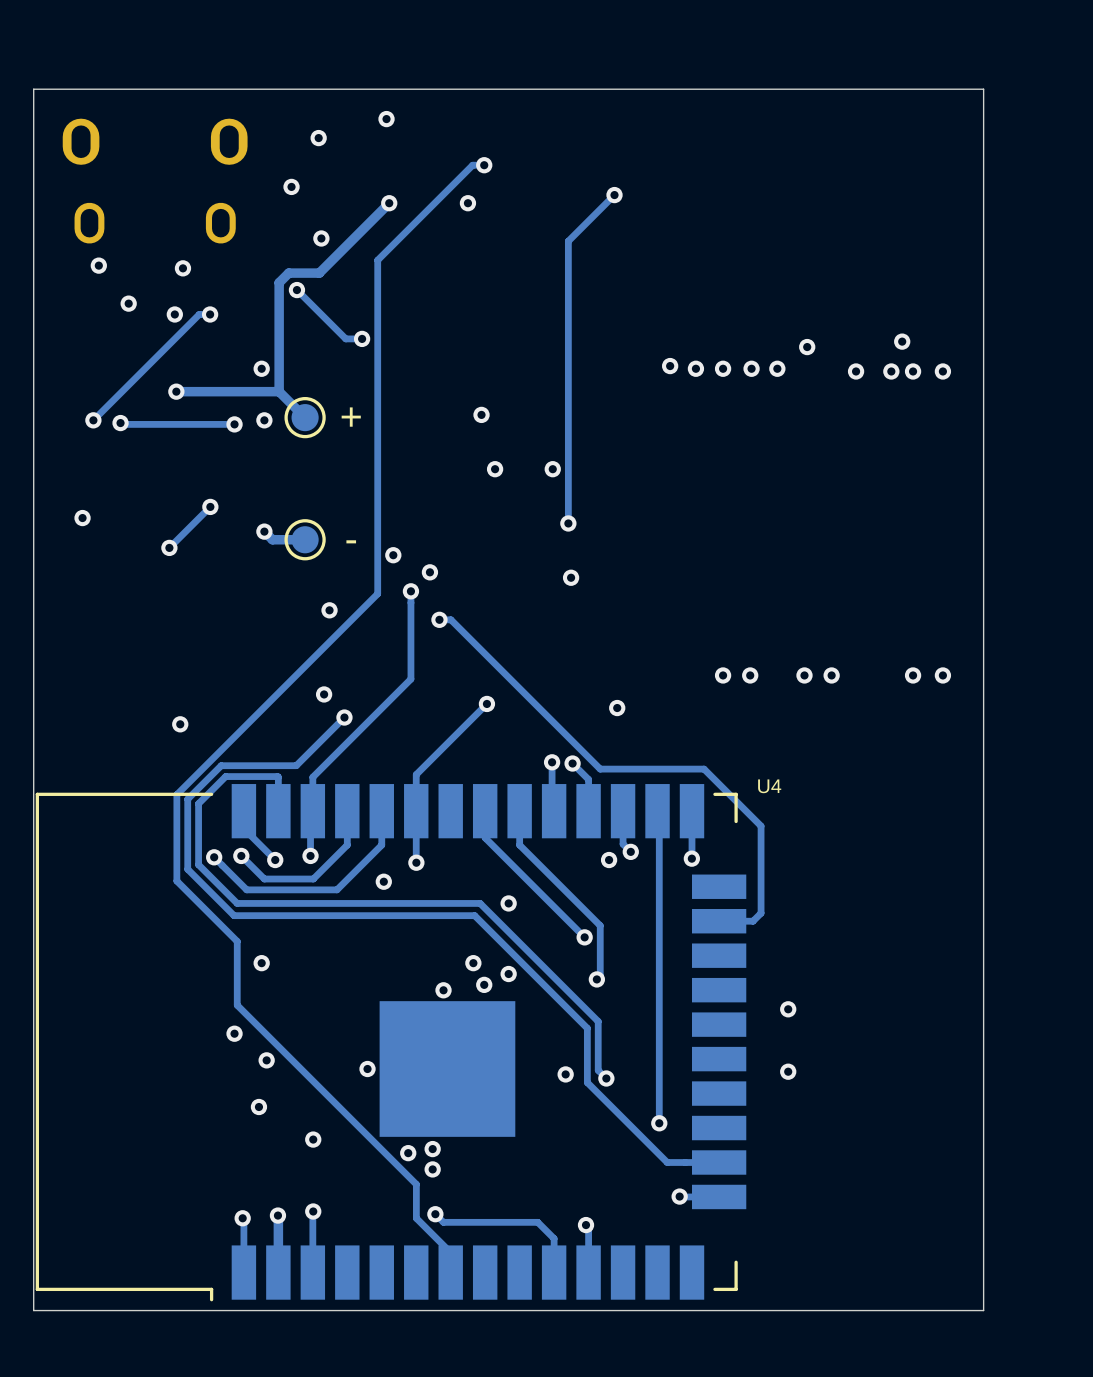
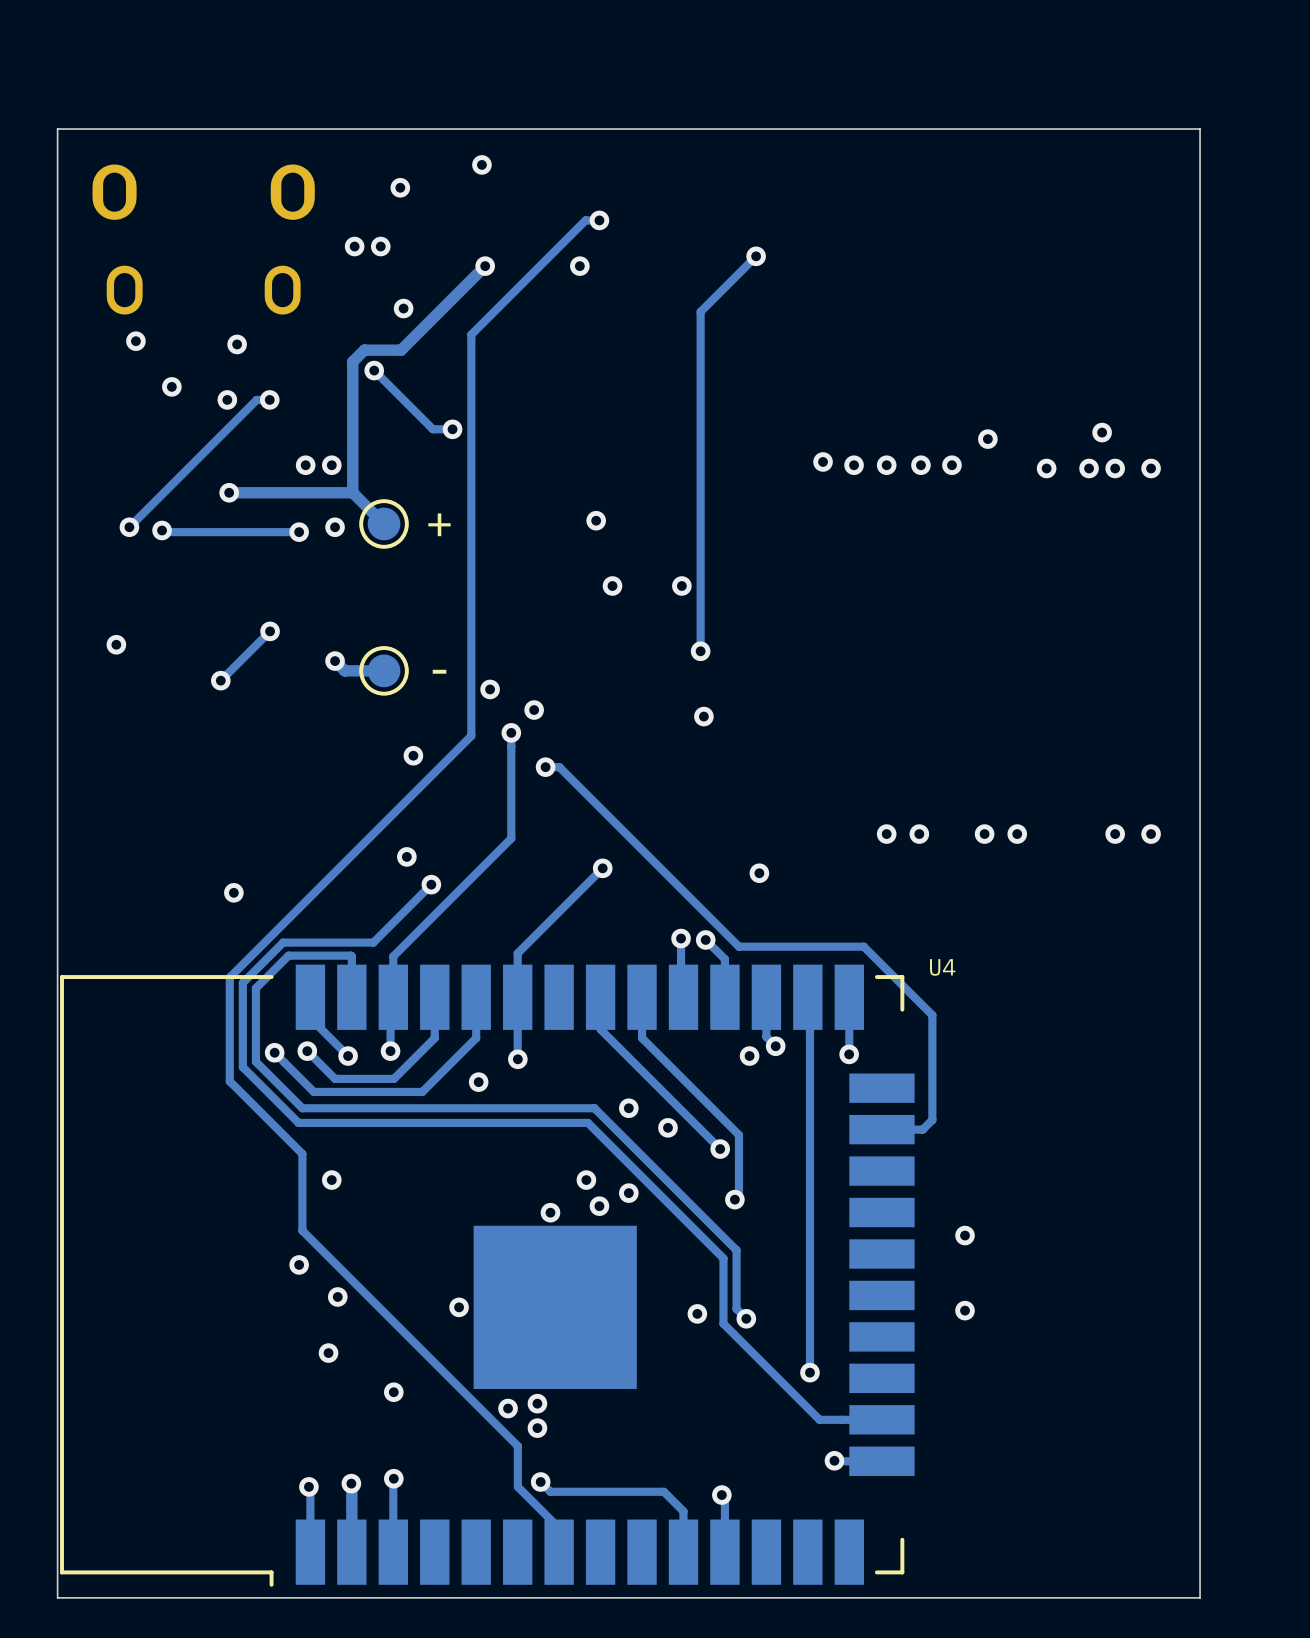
via: none -> (354, 246)
via: (291, 186) -> none
via: none -> (380, 246)
via: none -> (305, 465)
via: none -> (667, 1127)

